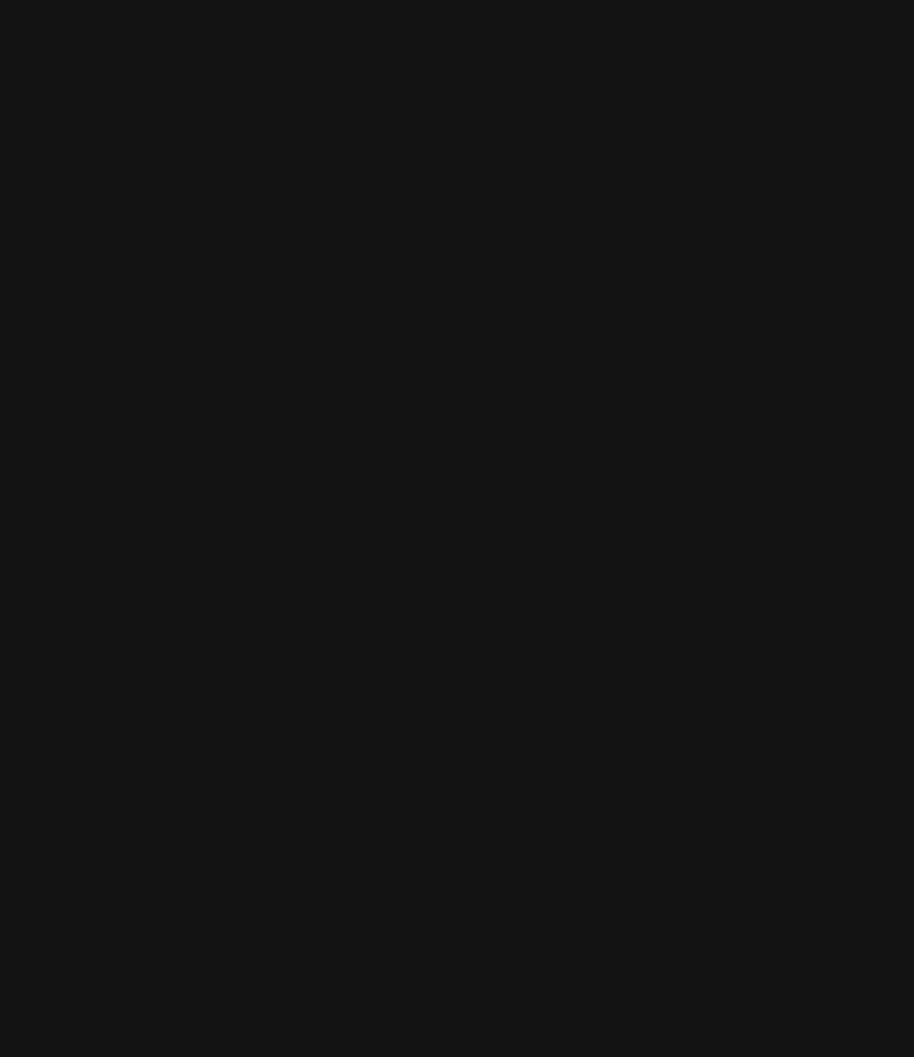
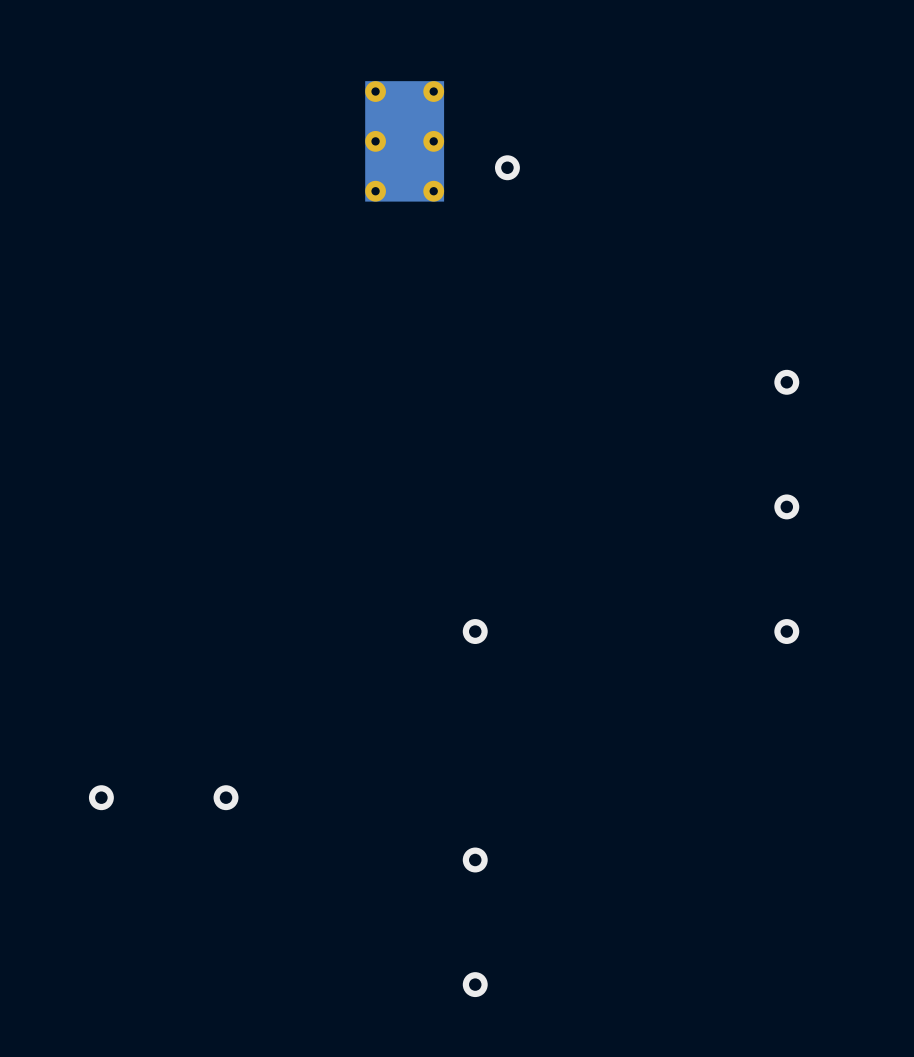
part: none -> (404, 141)
via: none -> (507, 167)
via: none -> (786, 382)
via: none -> (786, 506)
via: none -> (475, 631)
via: none -> (786, 631)
via: none -> (101, 797)
via: none -> (226, 797)
via: none -> (475, 859)
via: none -> (475, 984)

